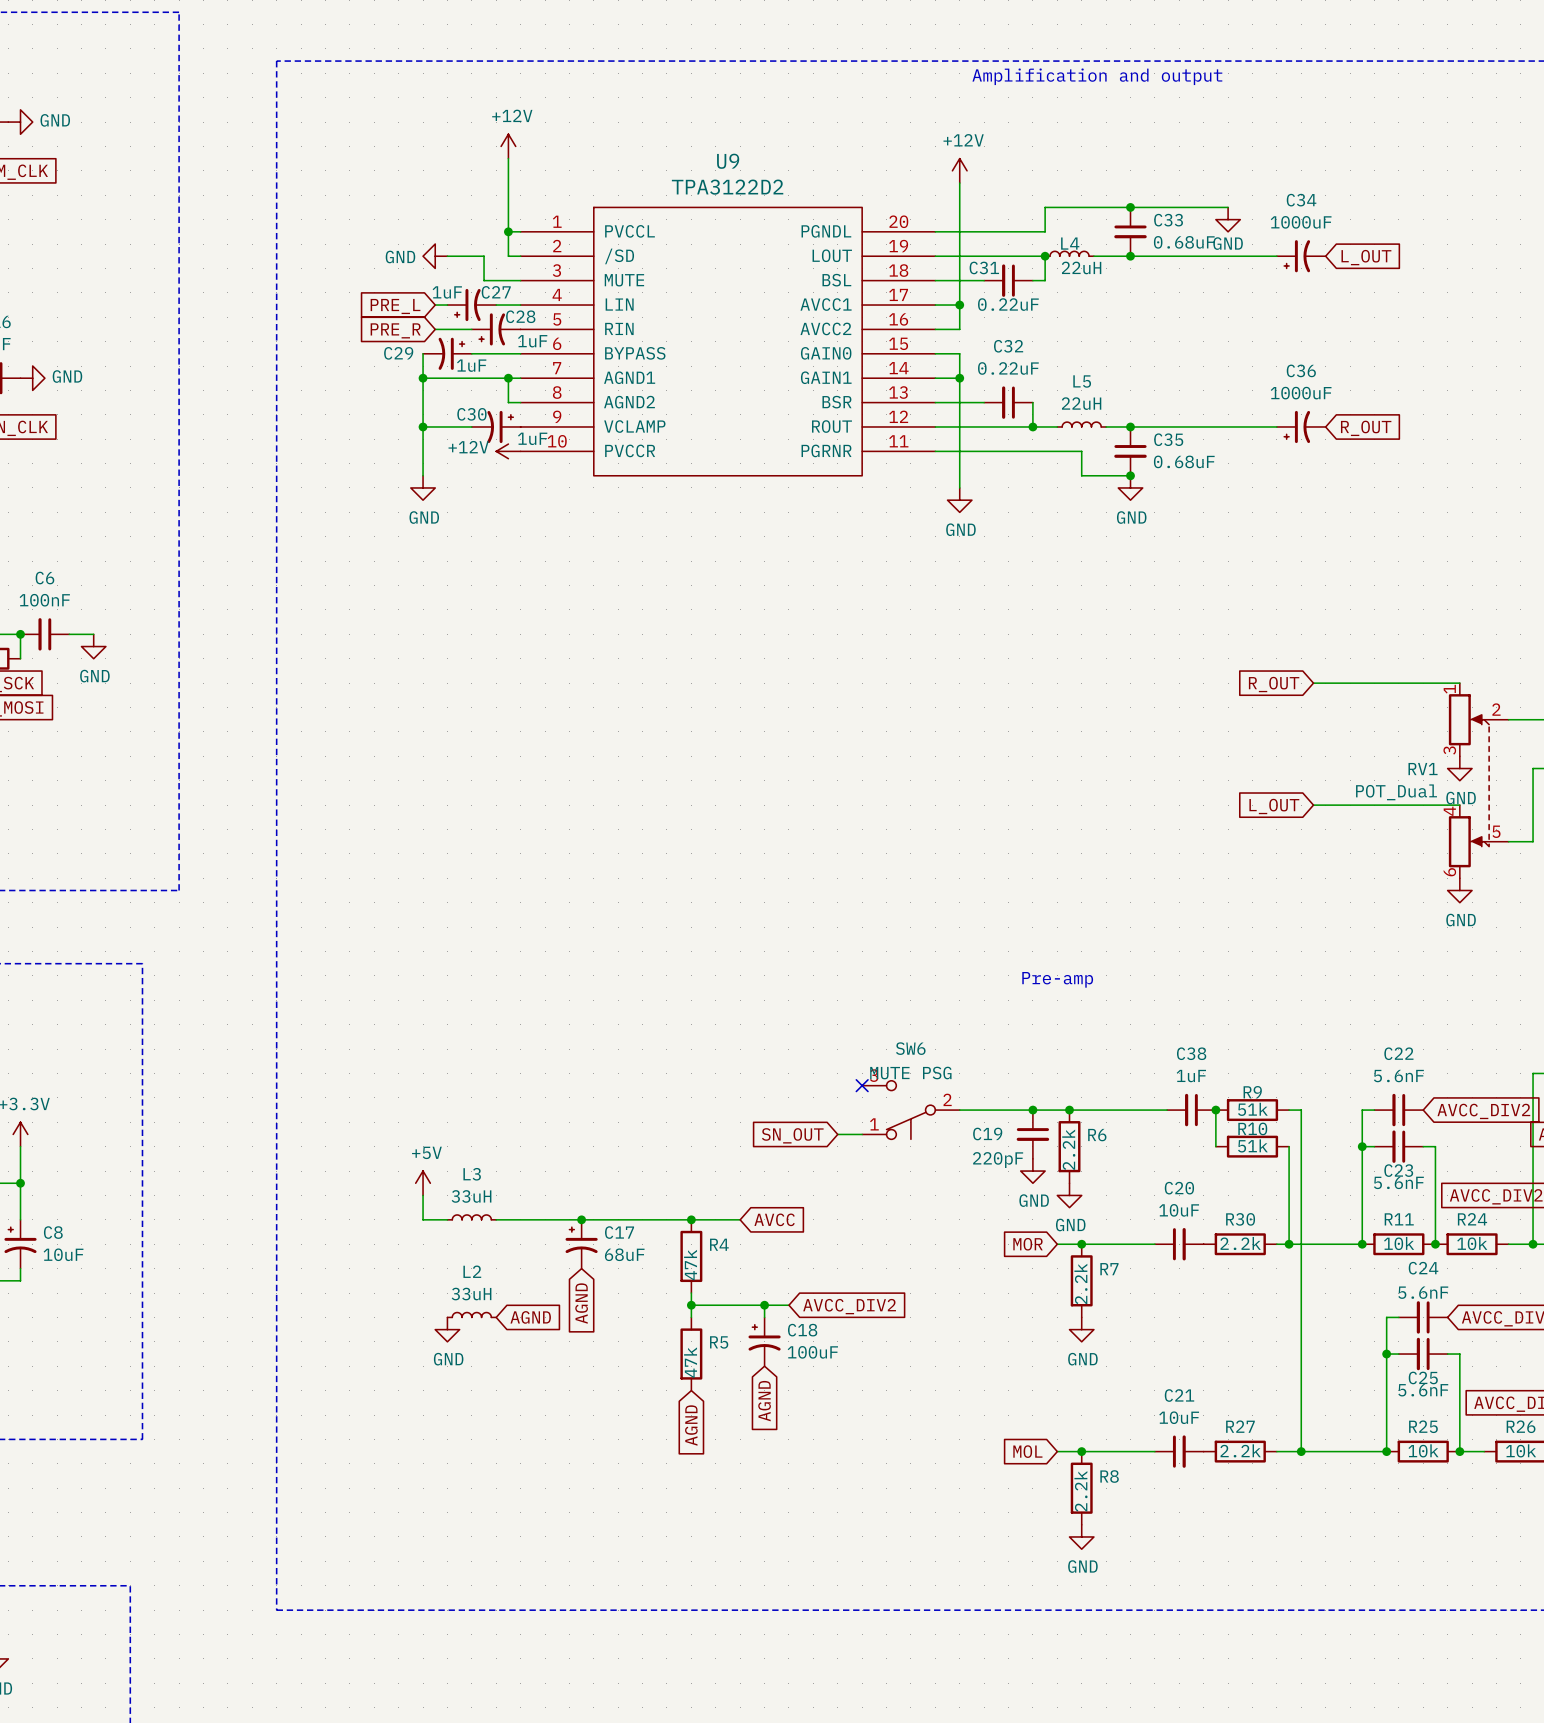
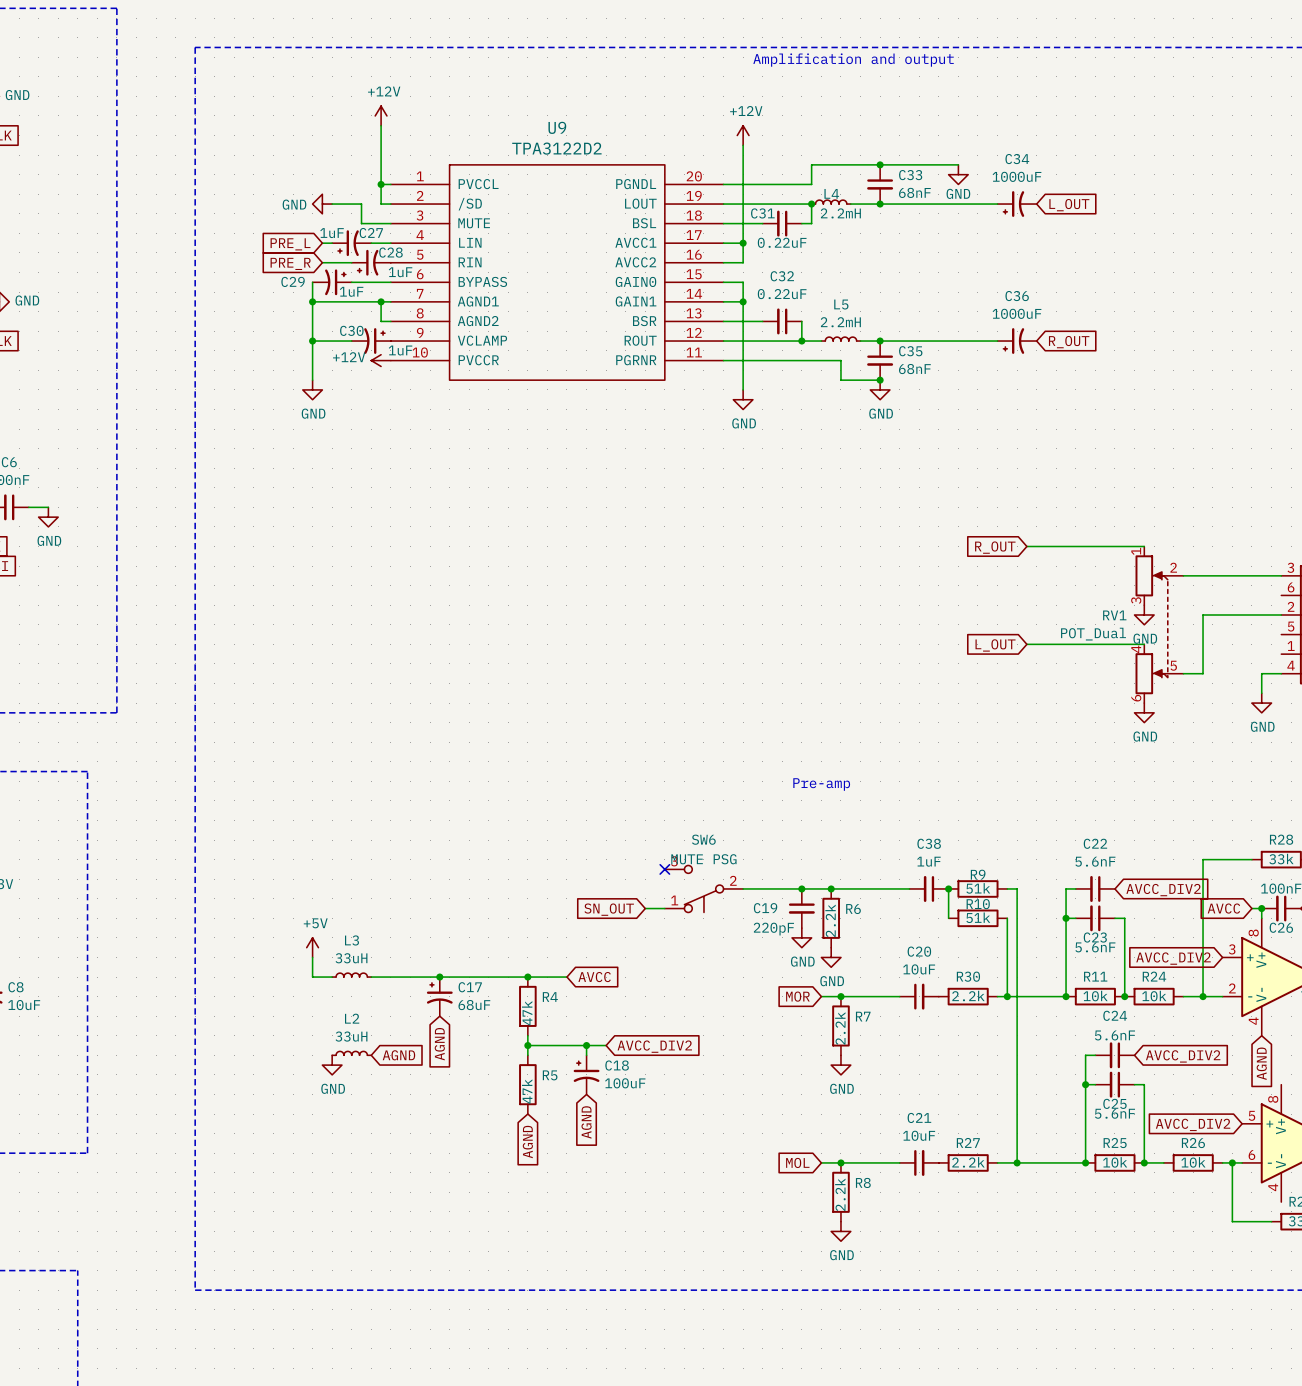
C33 value: 0.68uF (1184, 242) -> 68nF (914, 192)
L4 value: 22uH (1081, 267) -> 2.2mH (840, 213)
L5 value: 22uH (1081, 403) -> 2.2mH (840, 322)
C35 value: 0.68uF (1184, 461) -> 68nF (914, 369)

